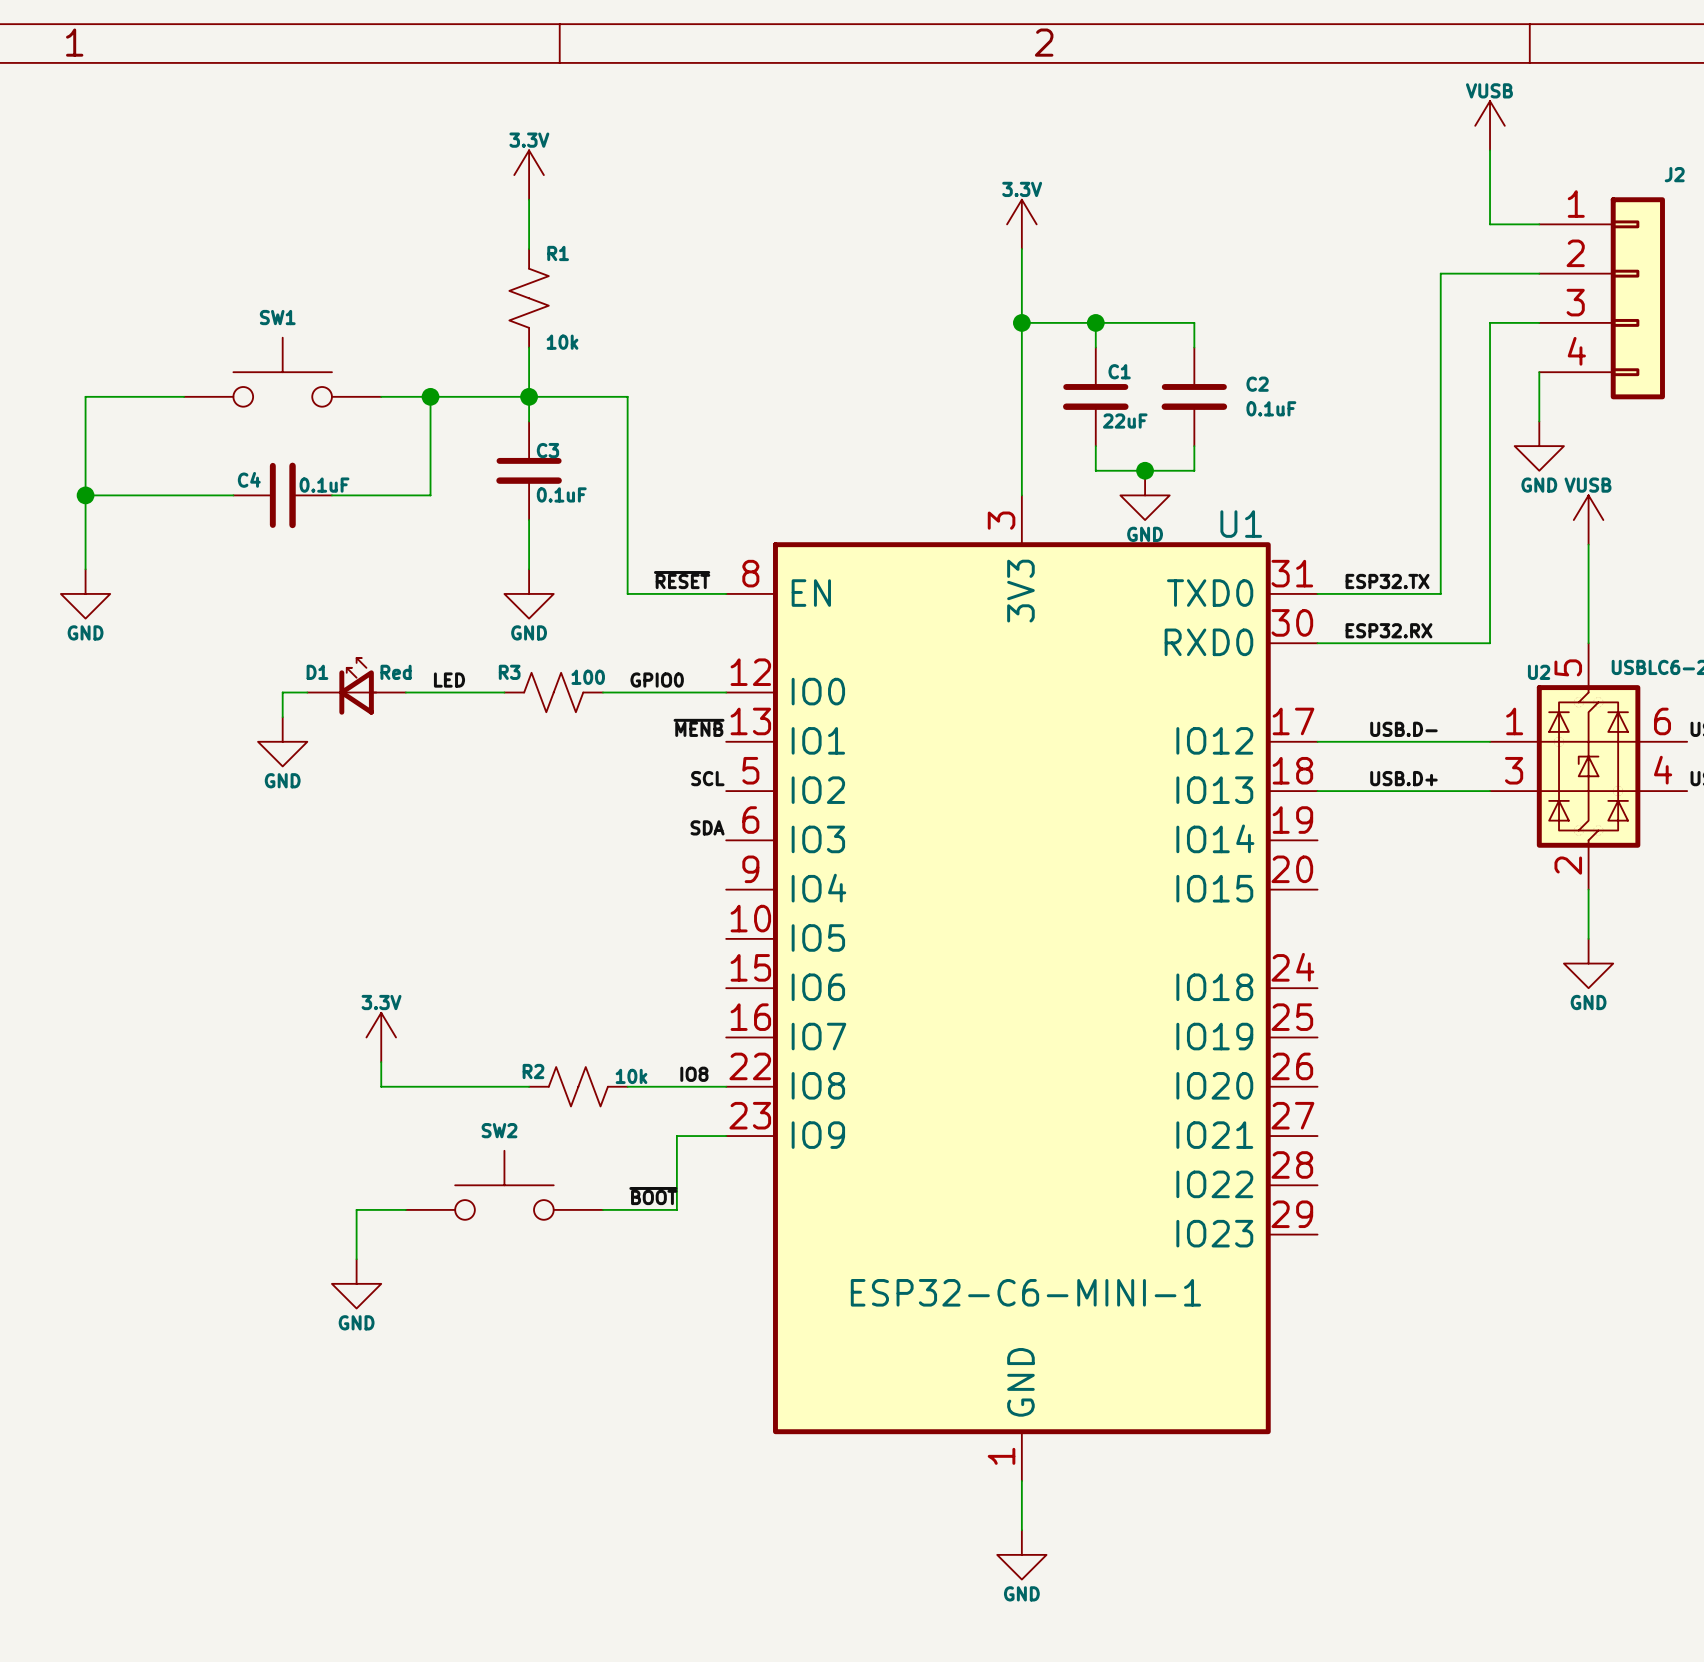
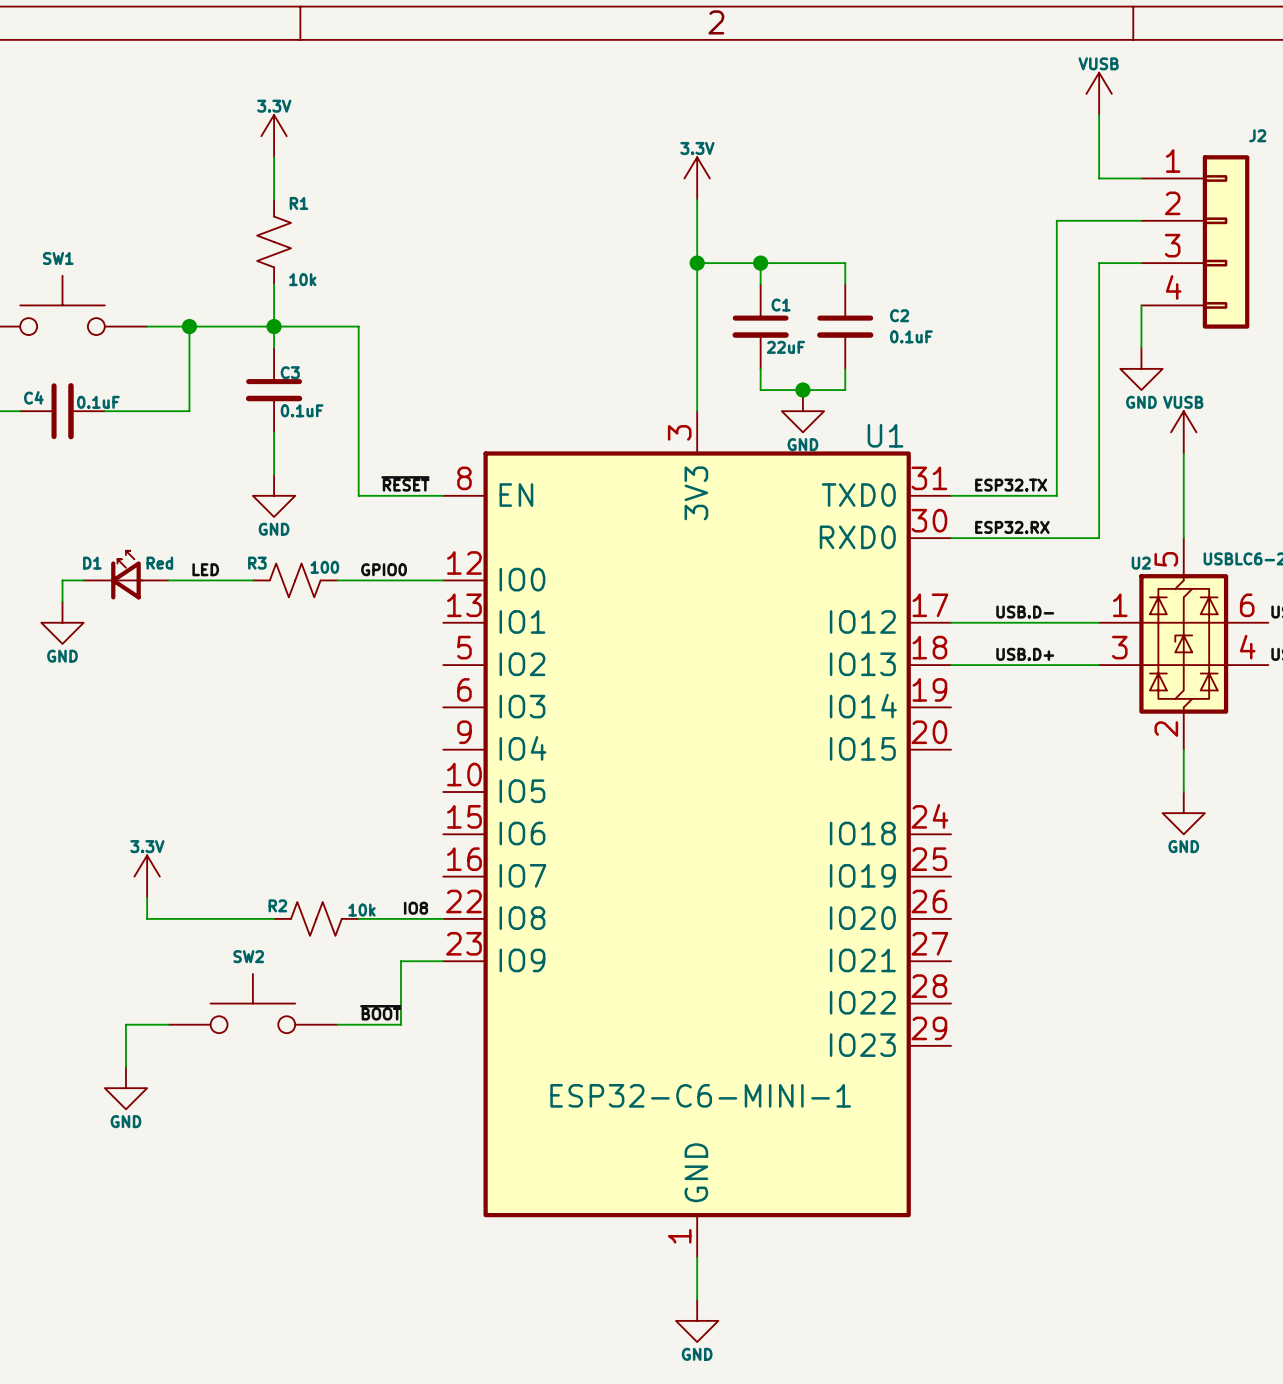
label: ~{MENB} (699, 727) -> none
label: SCL (707, 778) -> none
label: SDA (707, 827) -> none

